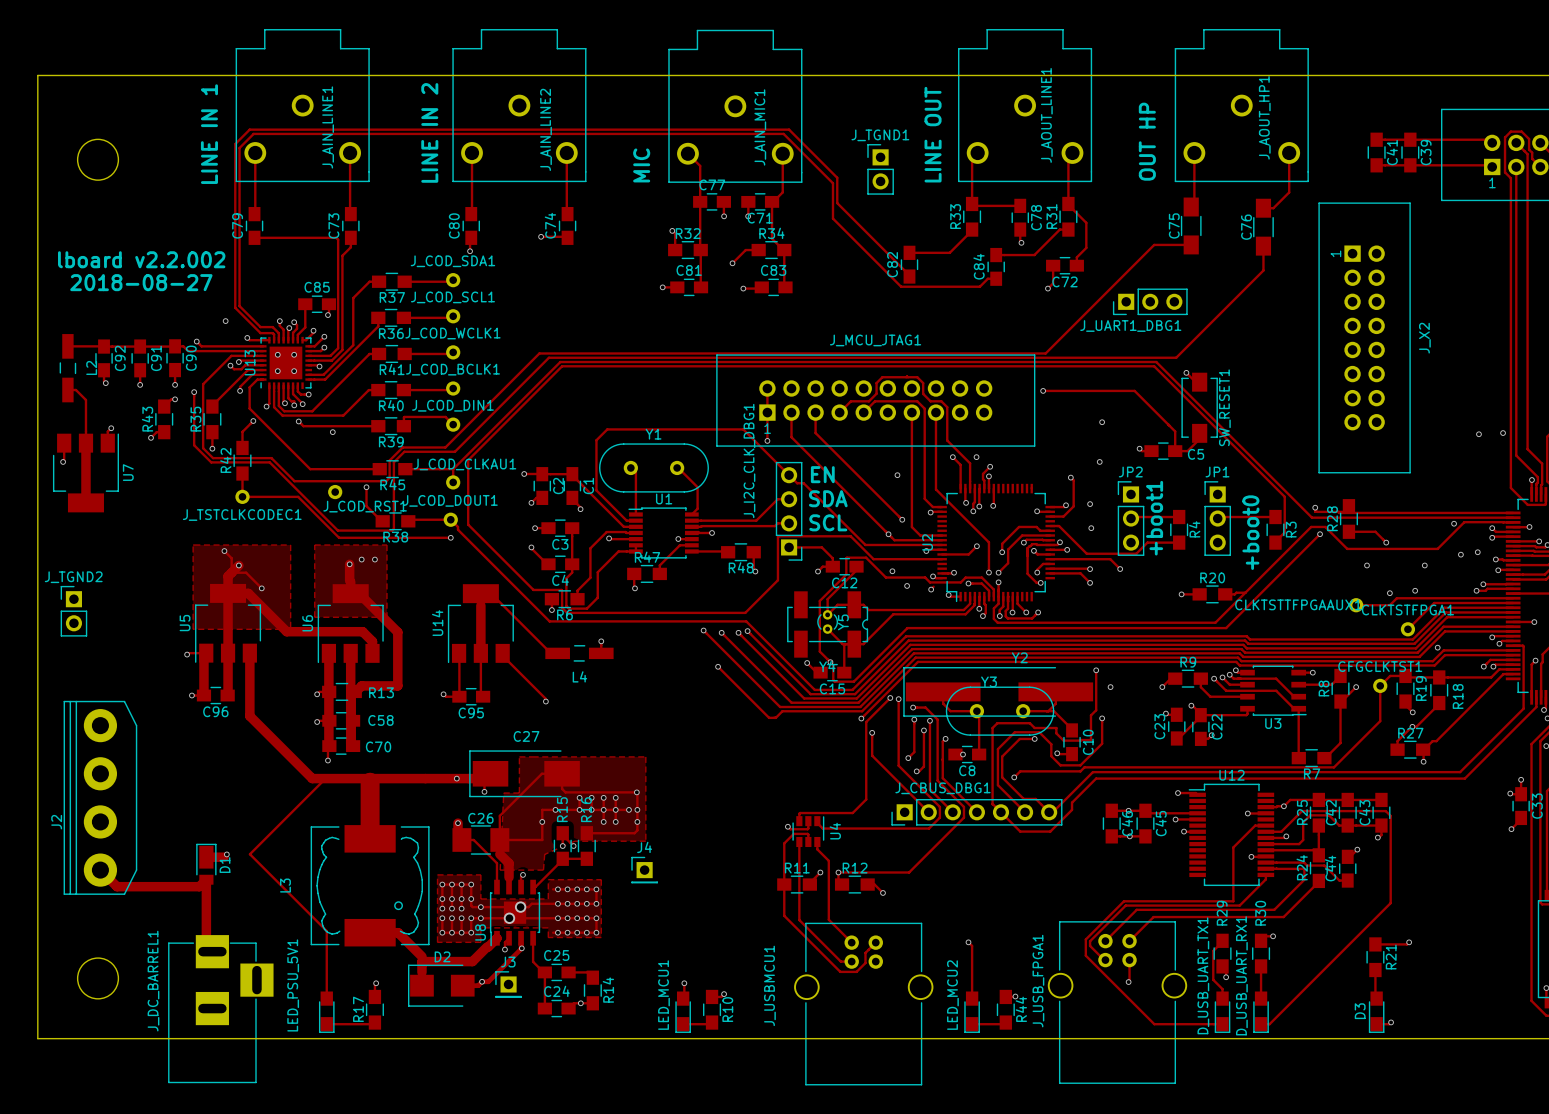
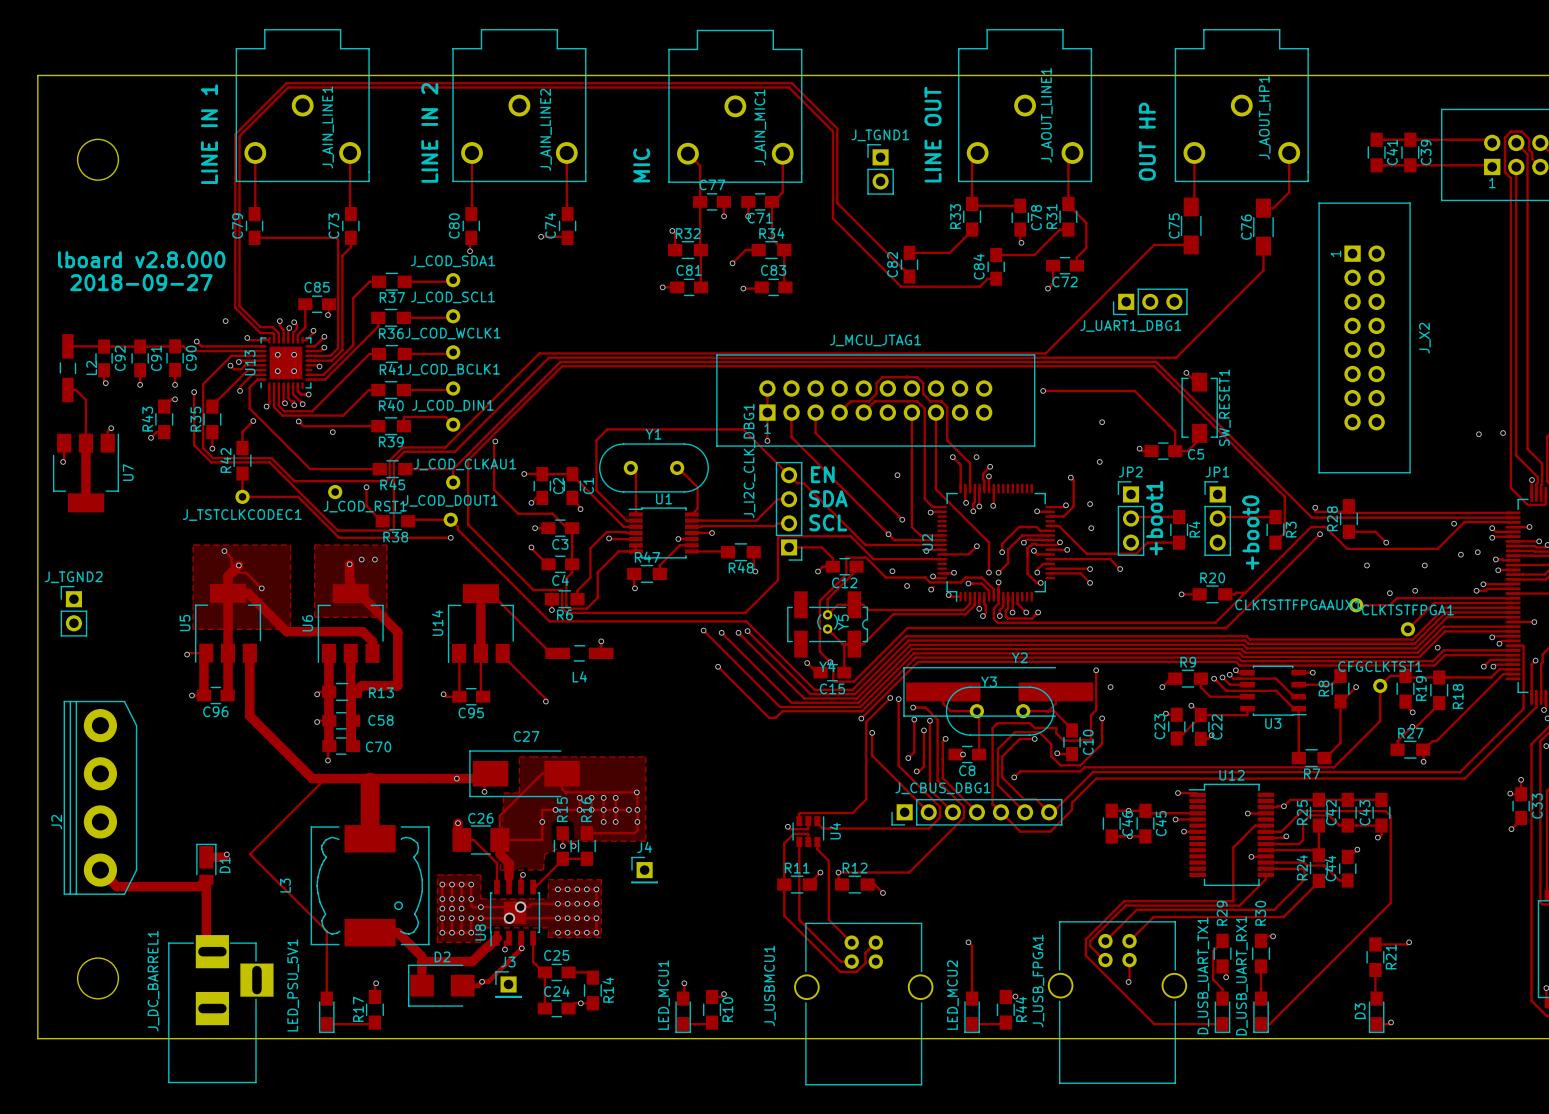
track: (235, 144) (249, 129) (789, 129) (837, 177) -> (235, 144) (235, 134) (286, 83) (792, 83) (837, 128) (837, 177)
track: (239, 148) (253, 133) (783, 133) (832, 183) -> (239, 148) (239, 136) (288, 87) (789, 87) (832, 131) (832, 183)
text: lboard v2.2.002 (141, 259) -> lboard v2.8.000 (141, 259)
text: 2018-08-27 (141, 282) -> 2018-09-27 (141, 282)
track: none -> (495, 441) (494, 489) (518, 513) (552, 513) (567, 528) (572, 528)
via: none -> (495, 441)

